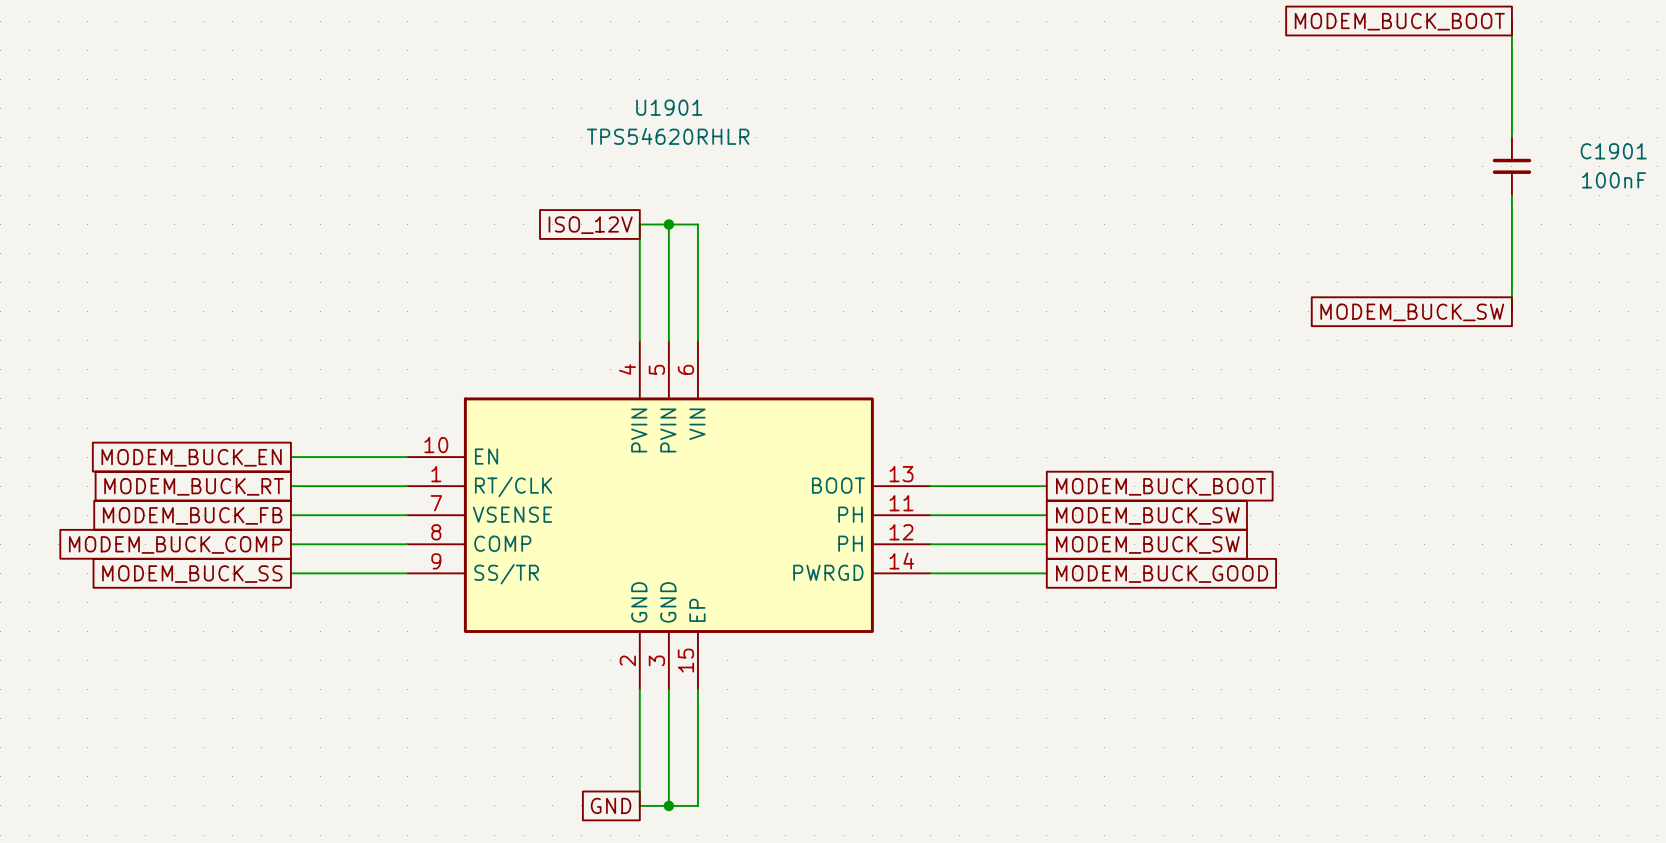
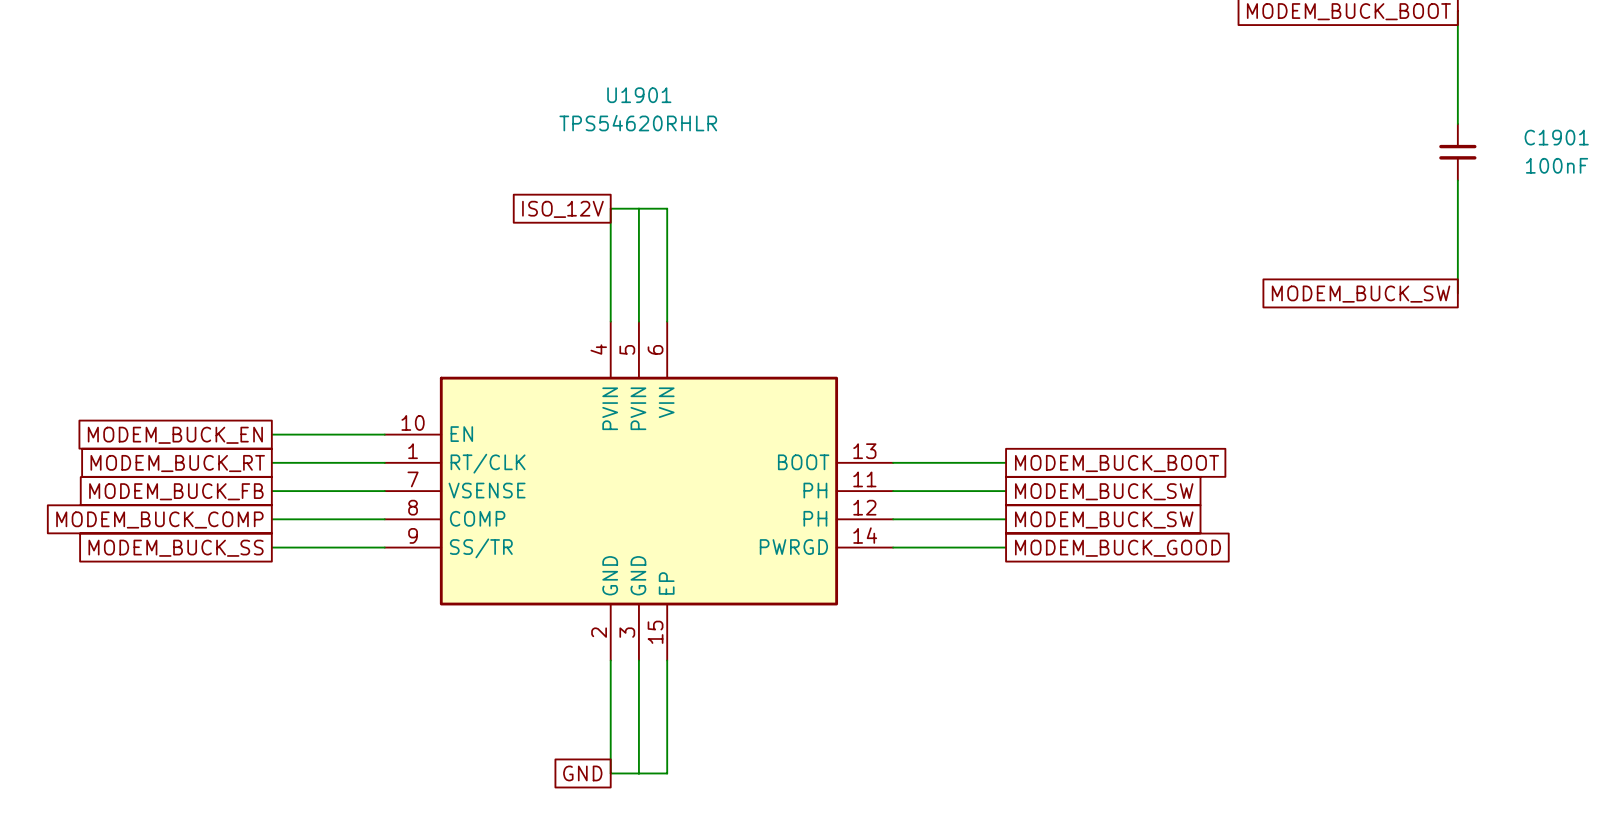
junction: (668, 224) -> none
junction: (668, 805) -> none

